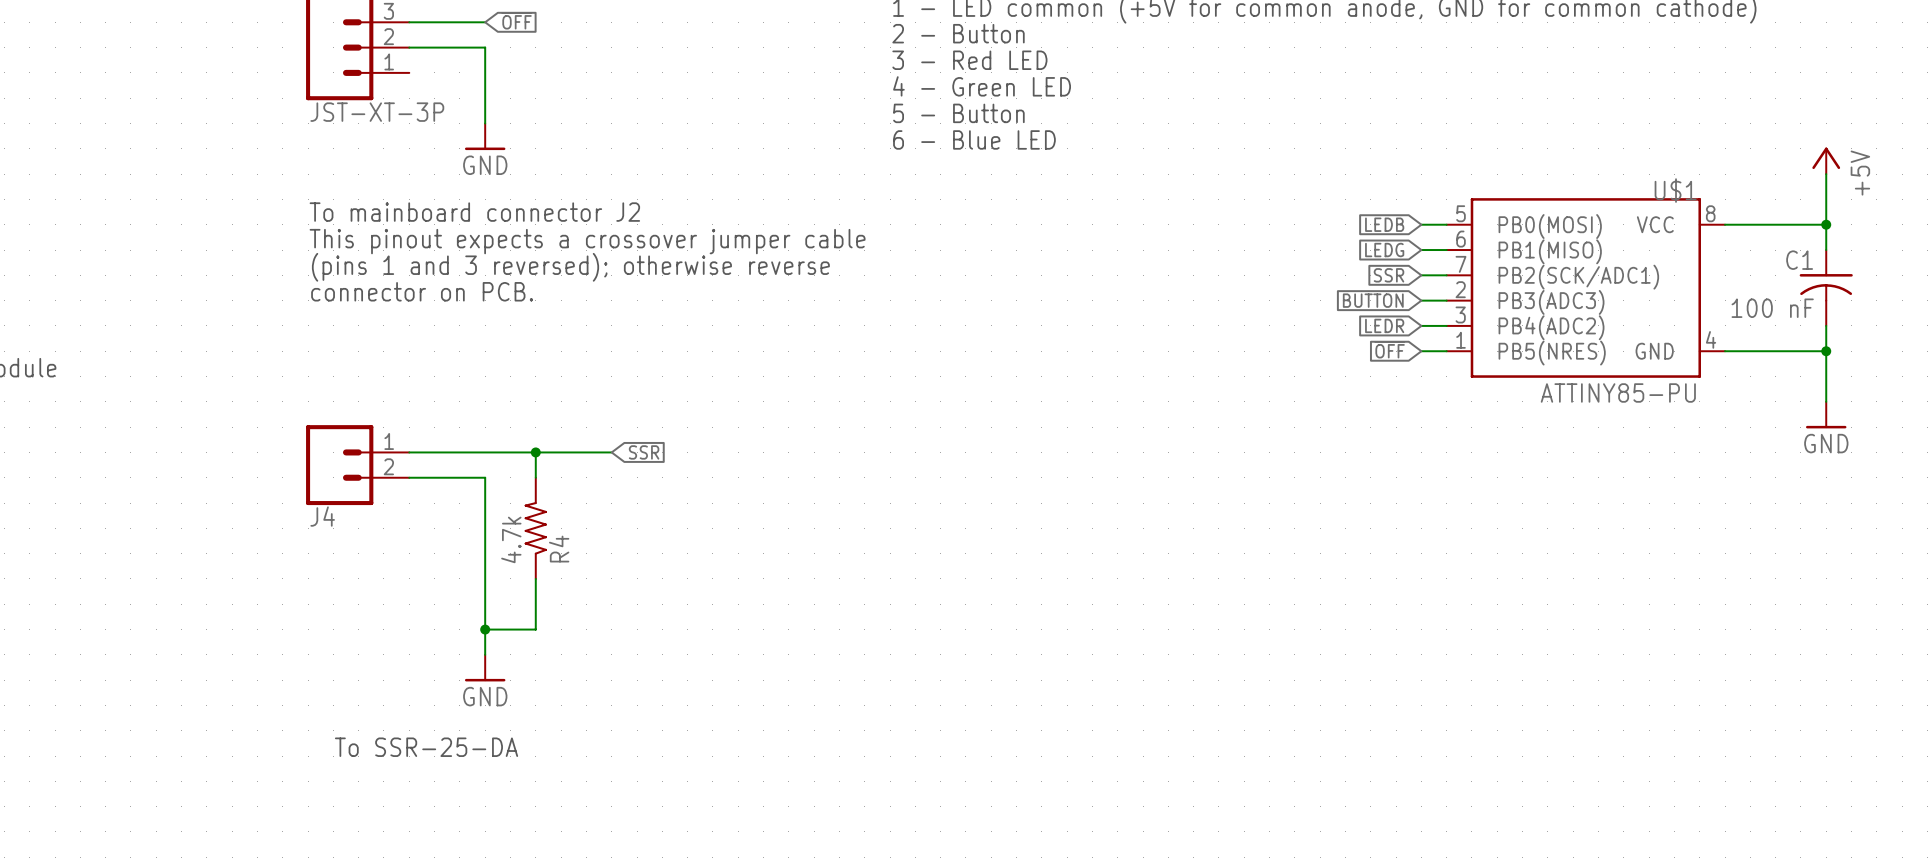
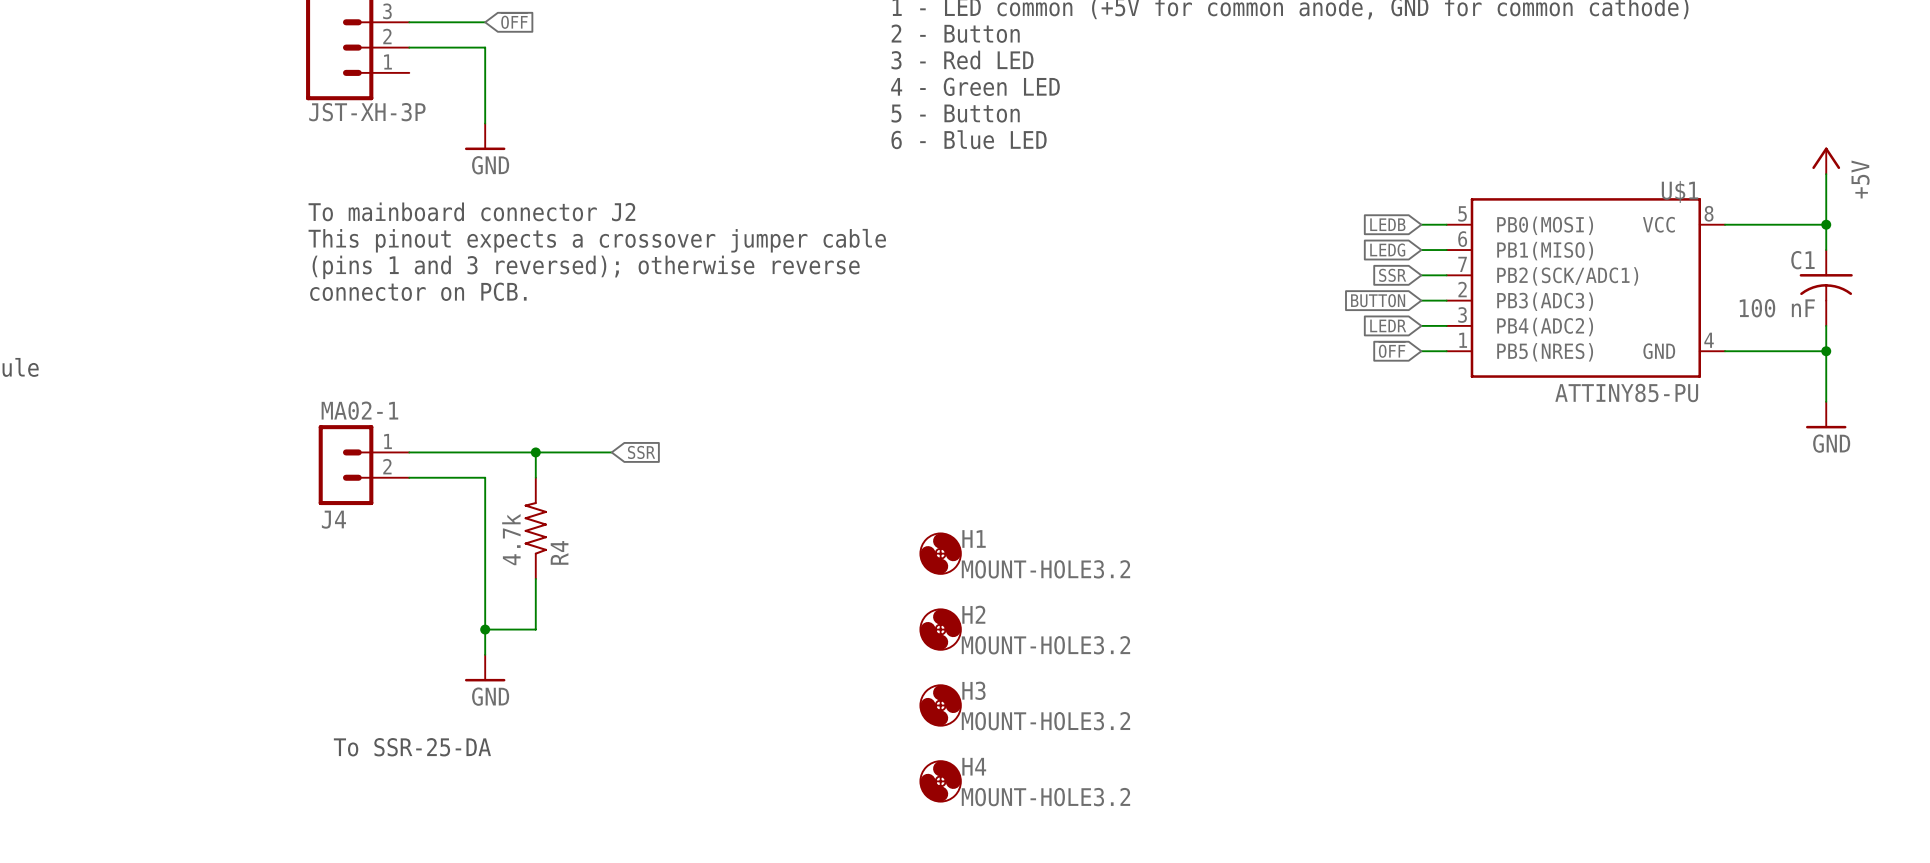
part value: JST-XT-3P (377, 112) -> JST-XH-3P (367, 112)
J4 value: none -> MA02-1 (359, 410)
J4 symbol: [306, 425, 410, 506] -> [318, 425, 410, 506]
H1: none -> MOUNT-HOLE3.2 (940, 553)
H2: none -> MOUNT-HOLE3.2 (940, 629)
H3: none -> MOUNT-HOLE3.2 (940, 705)
H4: none -> MOUNT-HOLE3.2 (940, 781)

